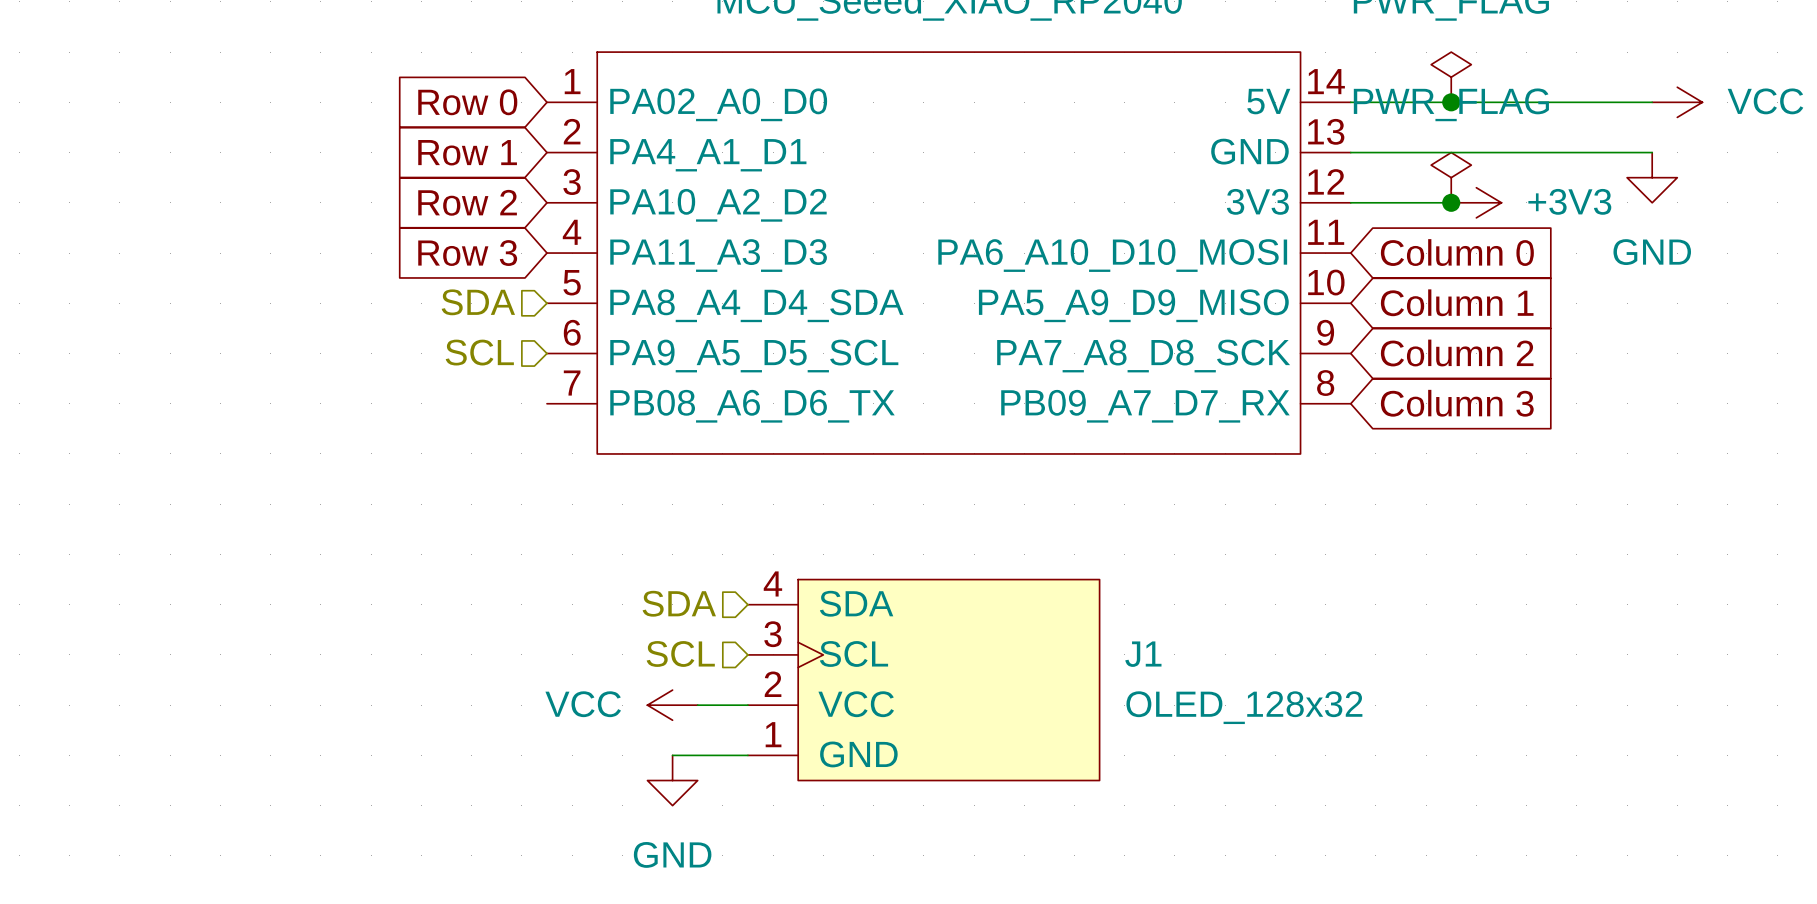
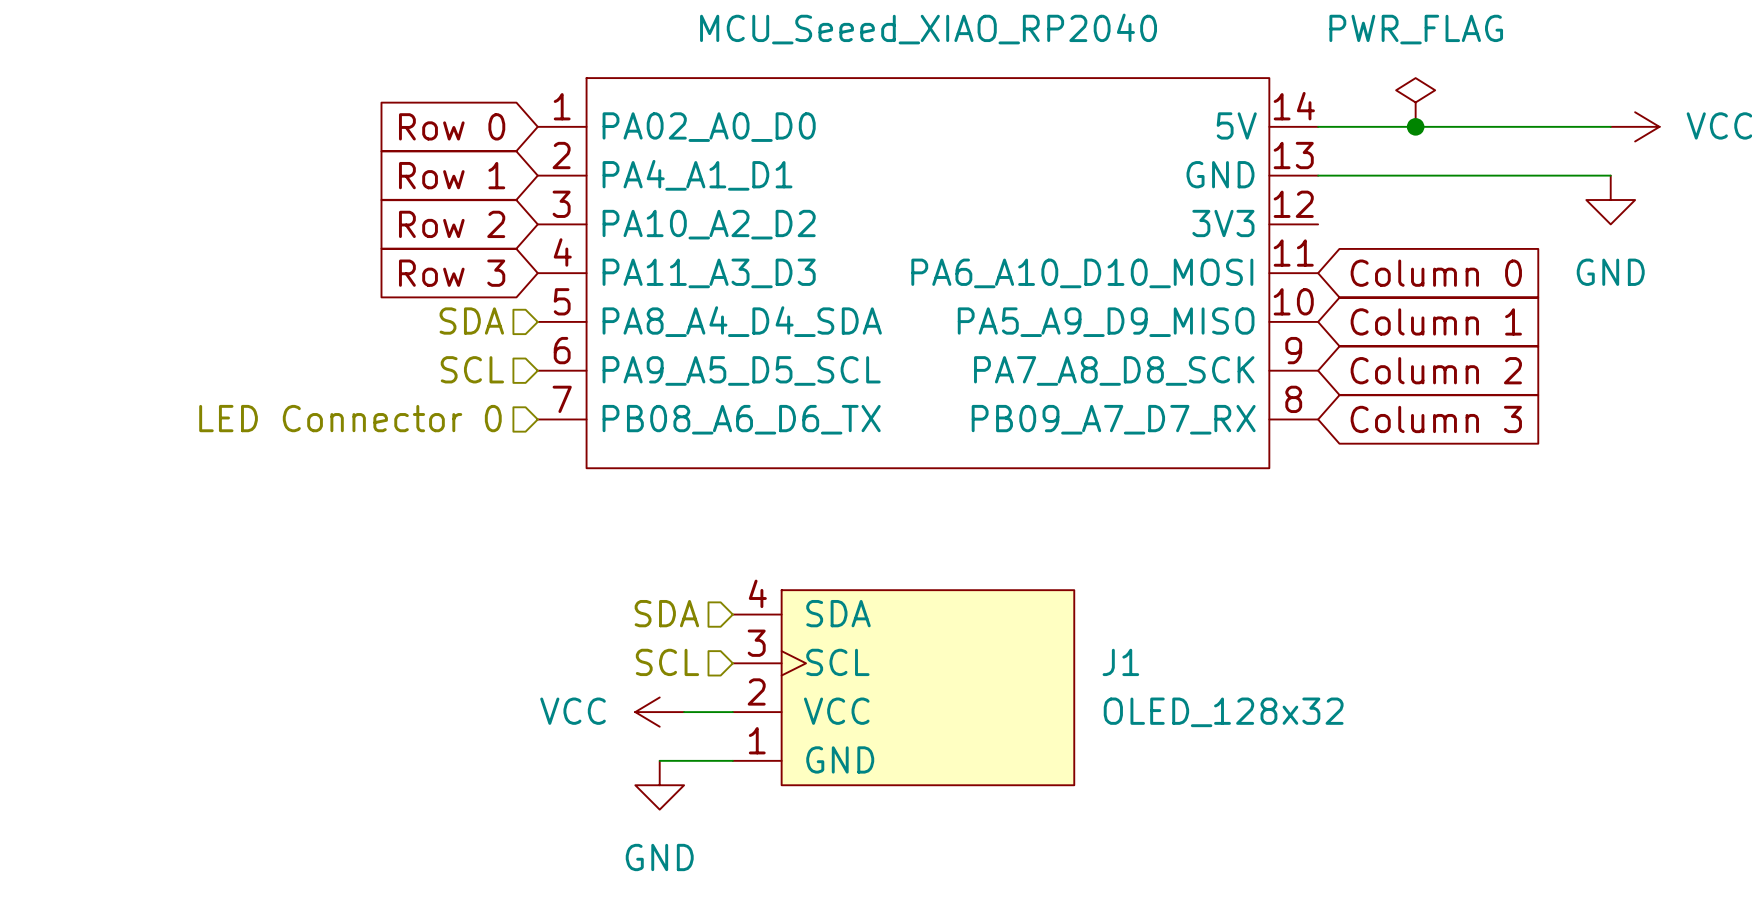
power symbol: PWR_FLAG (1451, 177) -> none
wire: (1350, 202) (1451, 202) -> none
junction: (1451, 202) -> none
power symbol: +3V3 (1476, 202) -> none
hierarchical label: none -> LED Connector 0 (350, 418)

